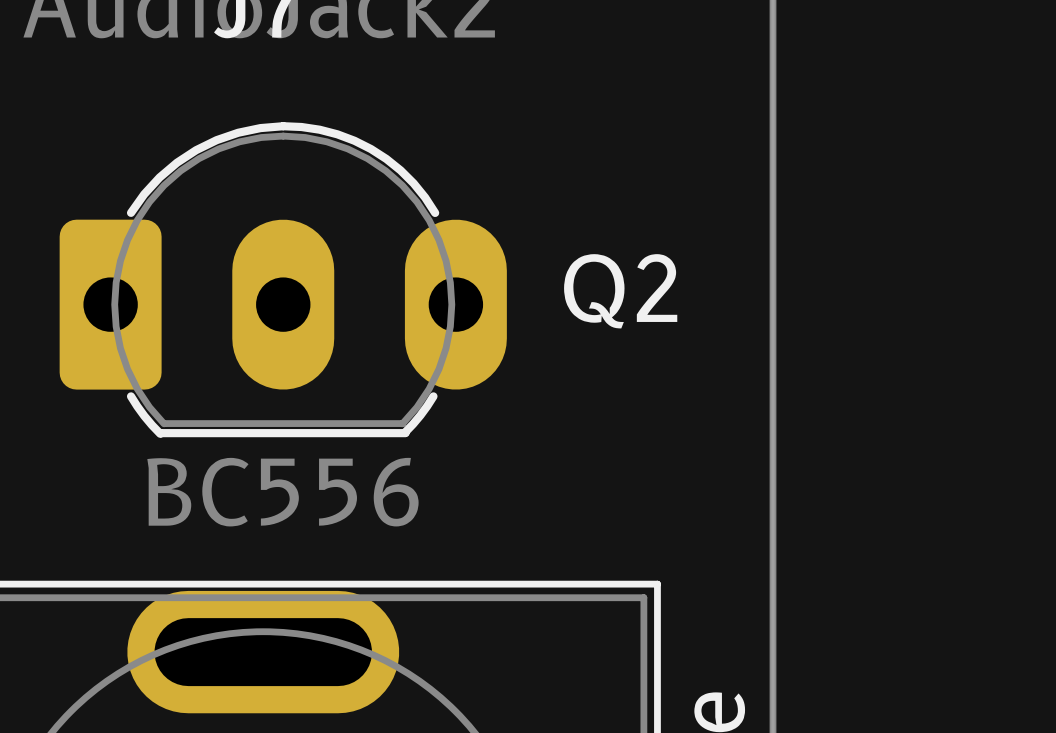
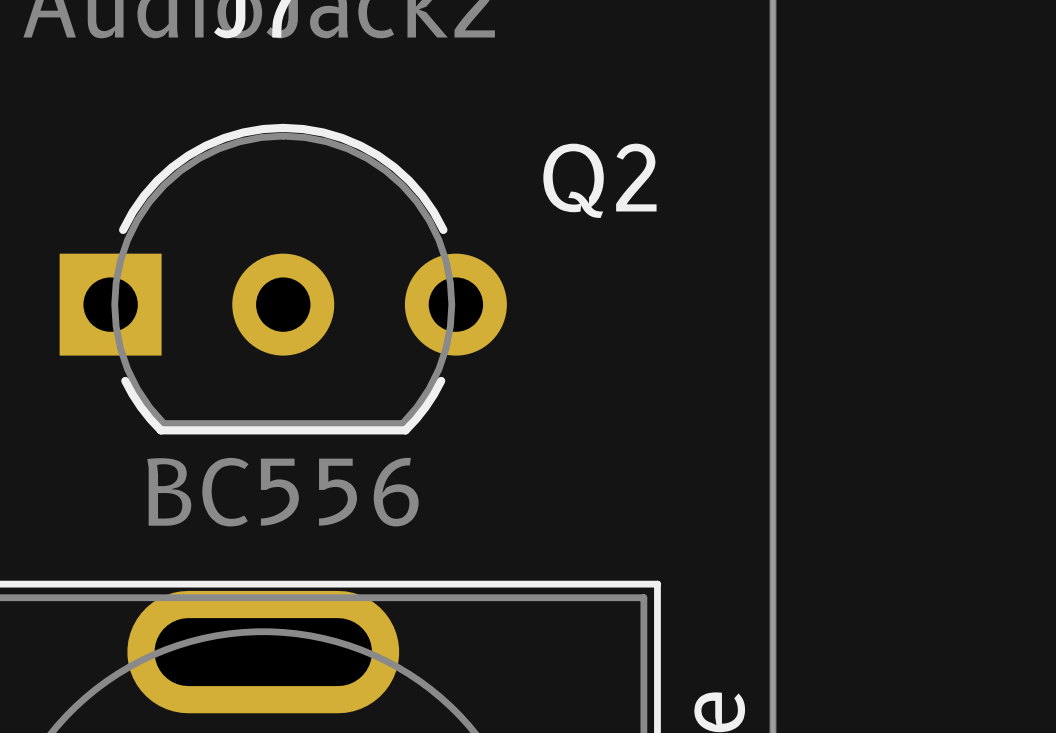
Q2 footprint: [59, 122, 507, 438] -> [59, 123, 507, 435]

